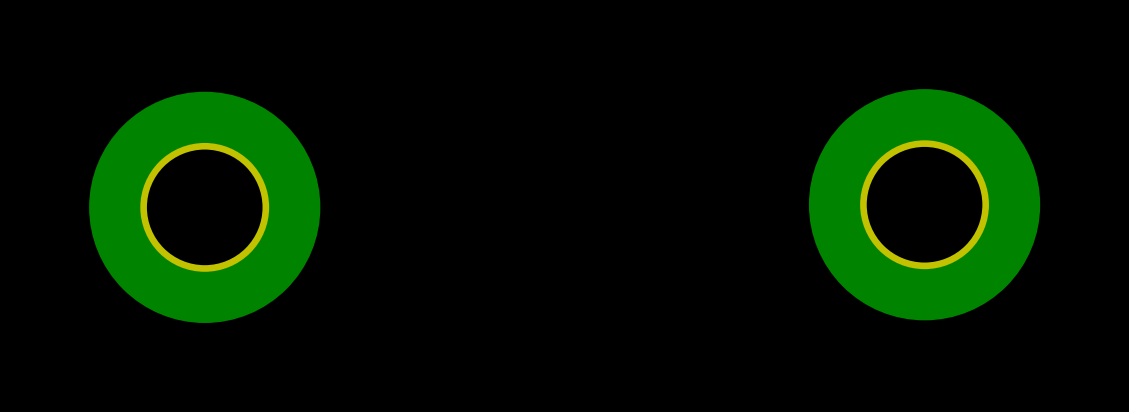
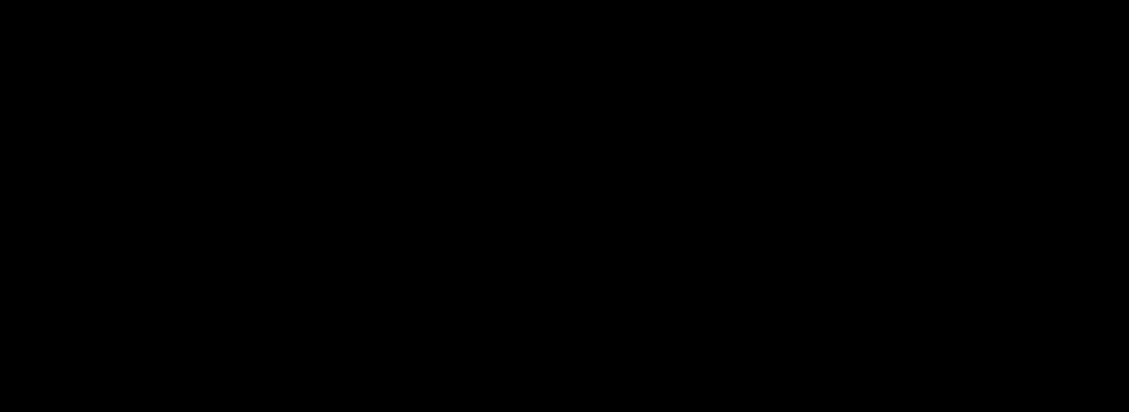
part: (924, 204) -> none
part: (204, 207) -> none

